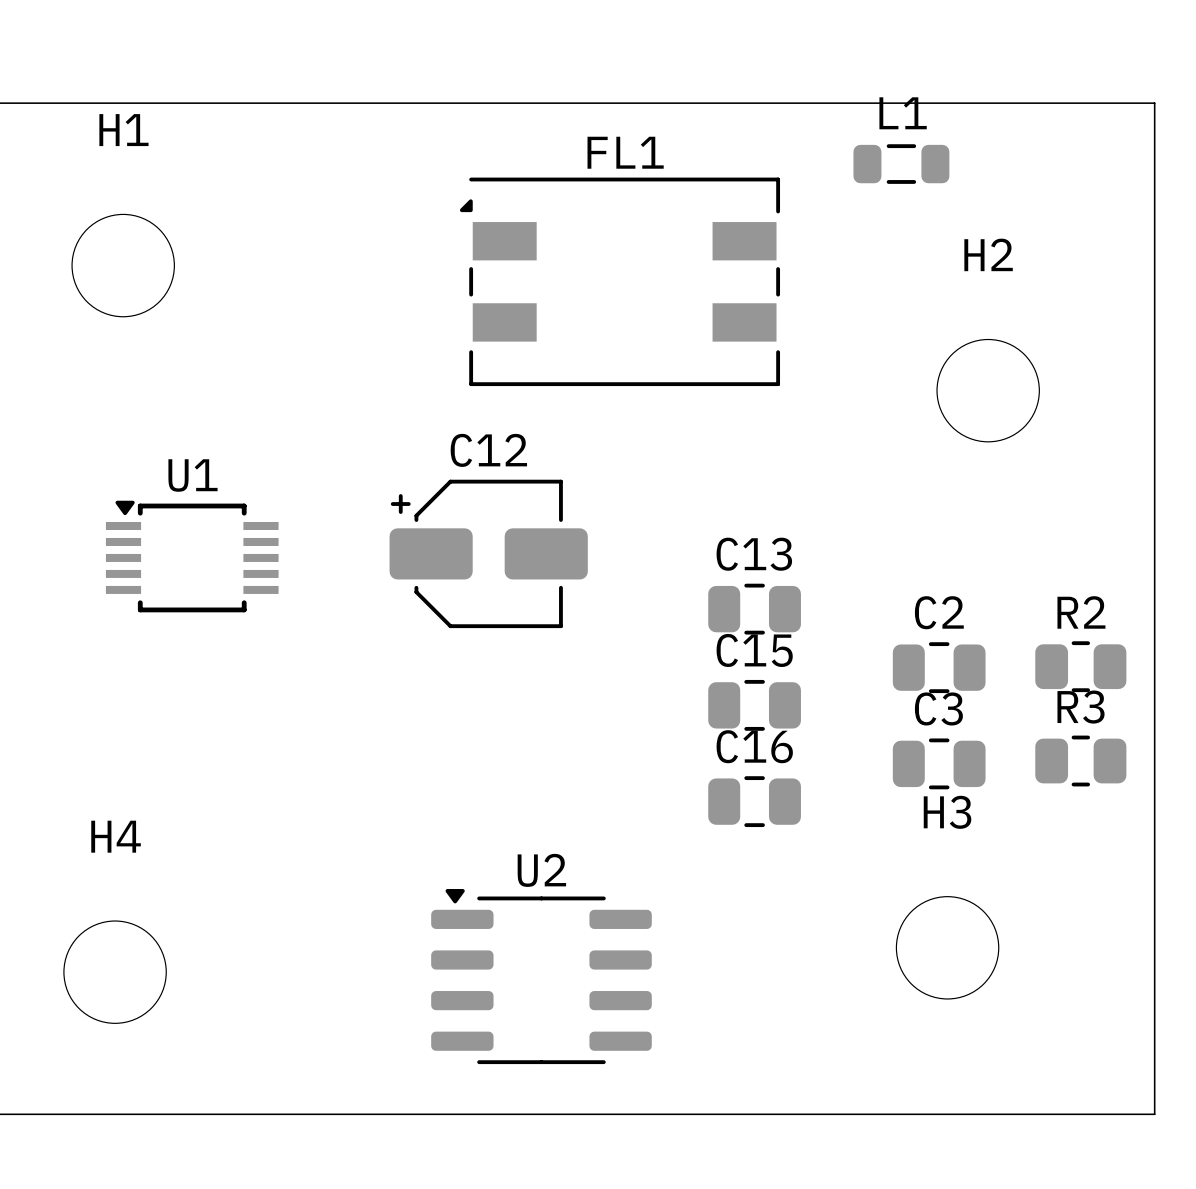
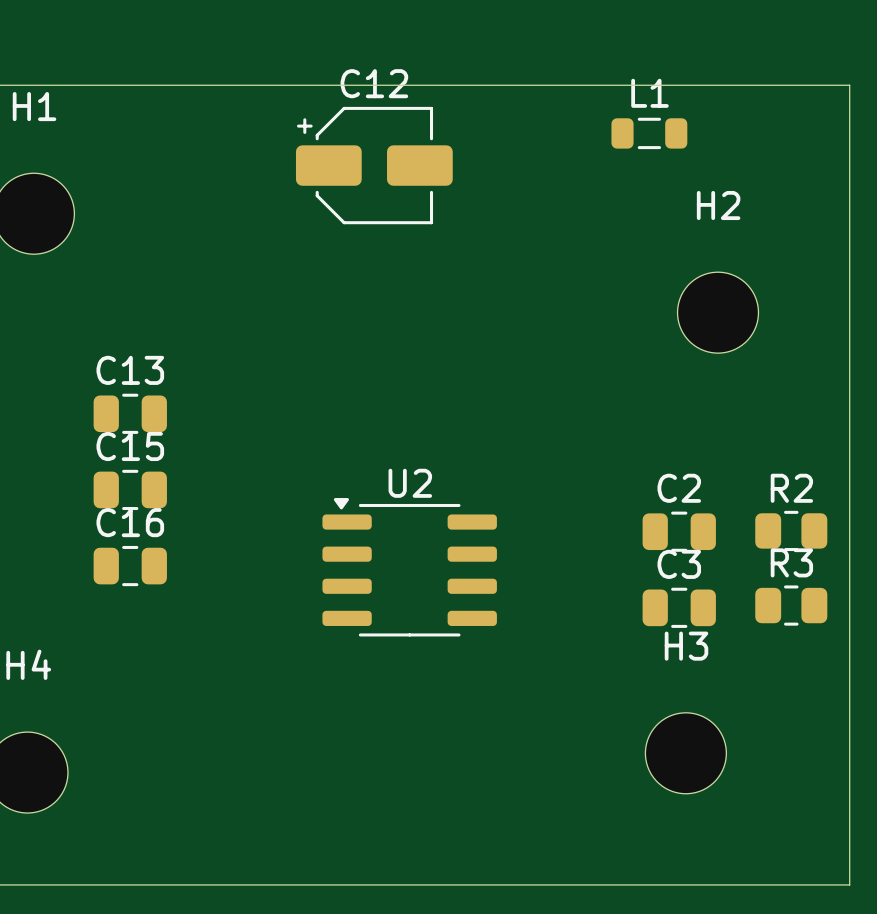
FL1: (619, 281) -> none
C12 position: (488, 553) -> (374, 165)
U1: (192, 556) -> none
C13 position: (754, 609) -> (130, 413)
C15 position: (754, 705) -> (130, 489)
C16 position: (754, 801) -> (130, 566)
U2 position: (541, 976) -> (409, 567)

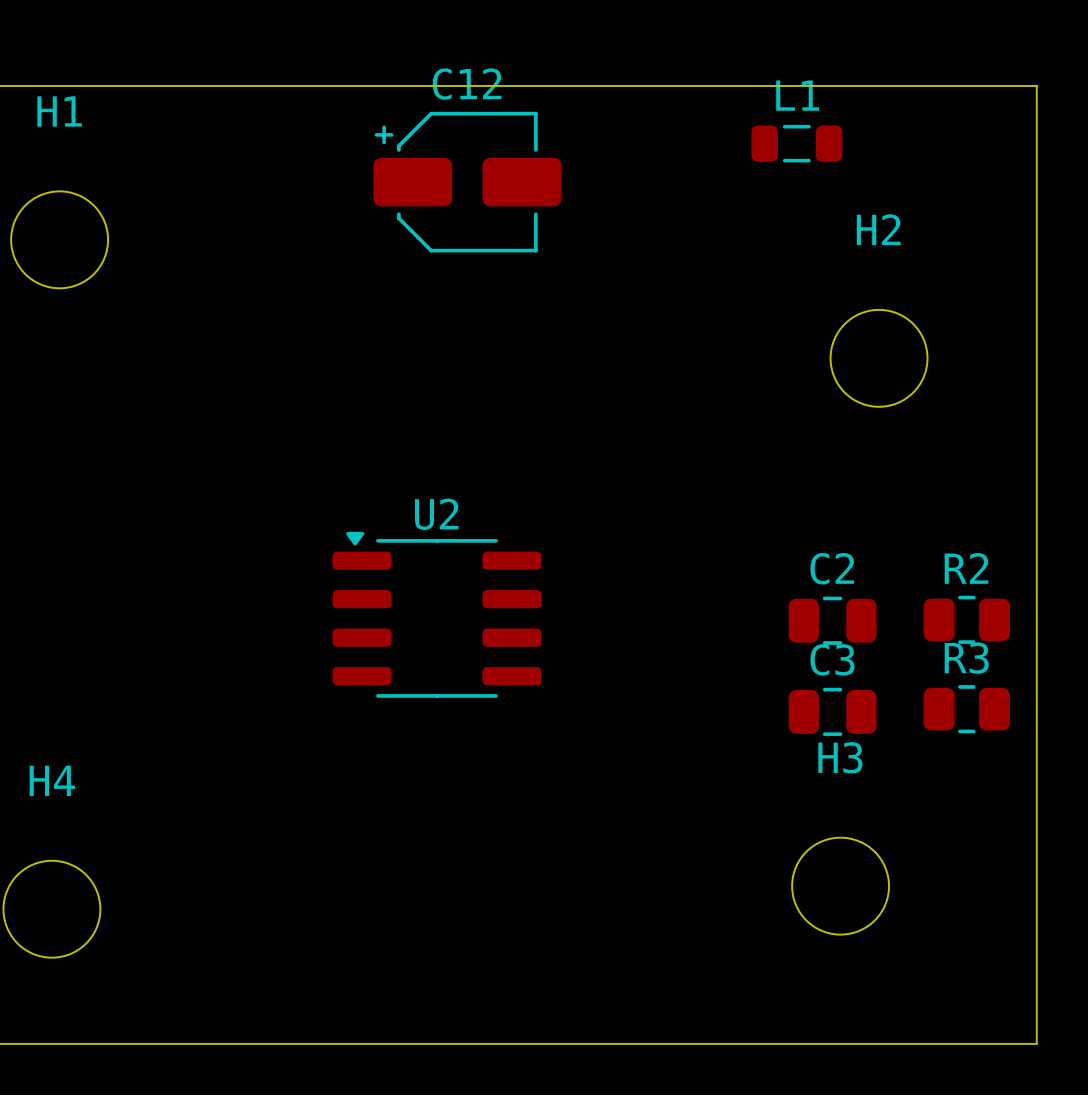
C13: (130, 413) -> none
C15: (130, 489) -> none
C16: (130, 566) -> none
U2 position: (409, 567) -> (437, 614)

